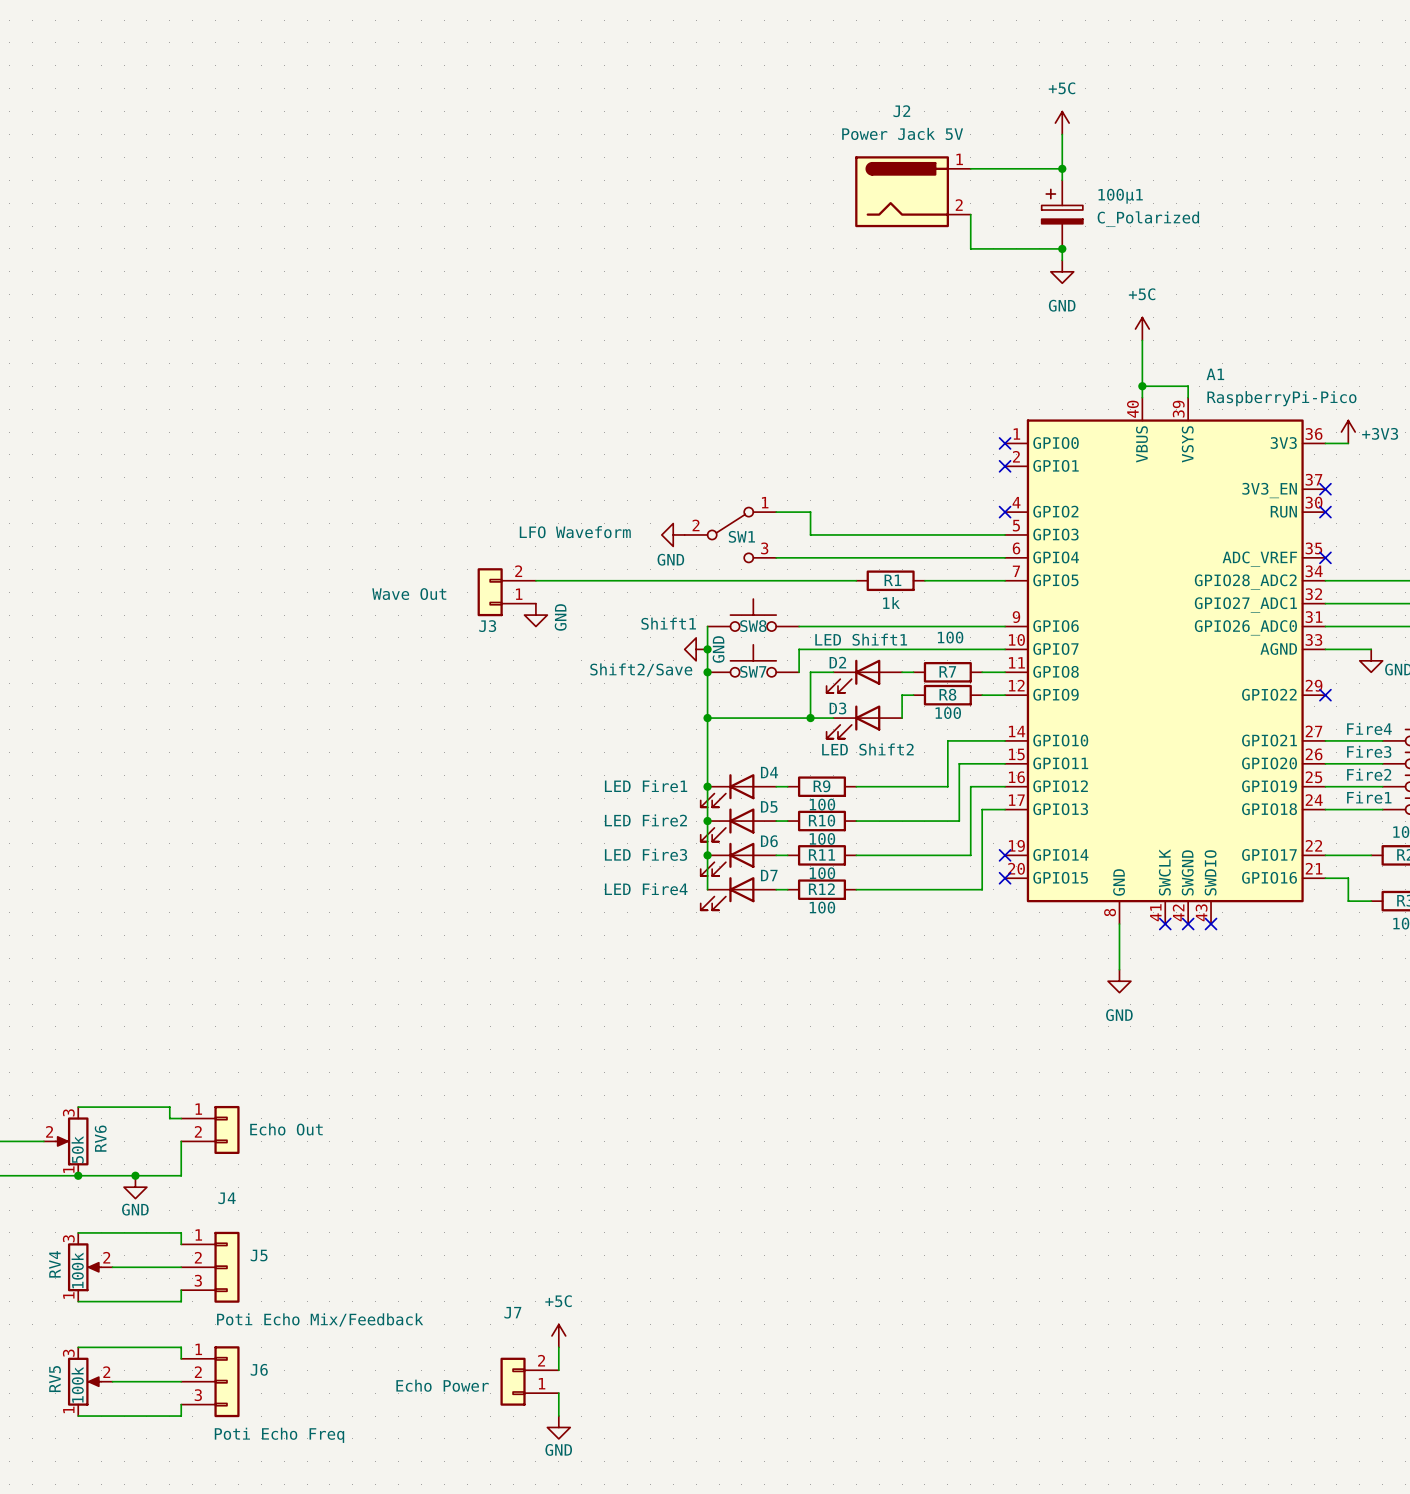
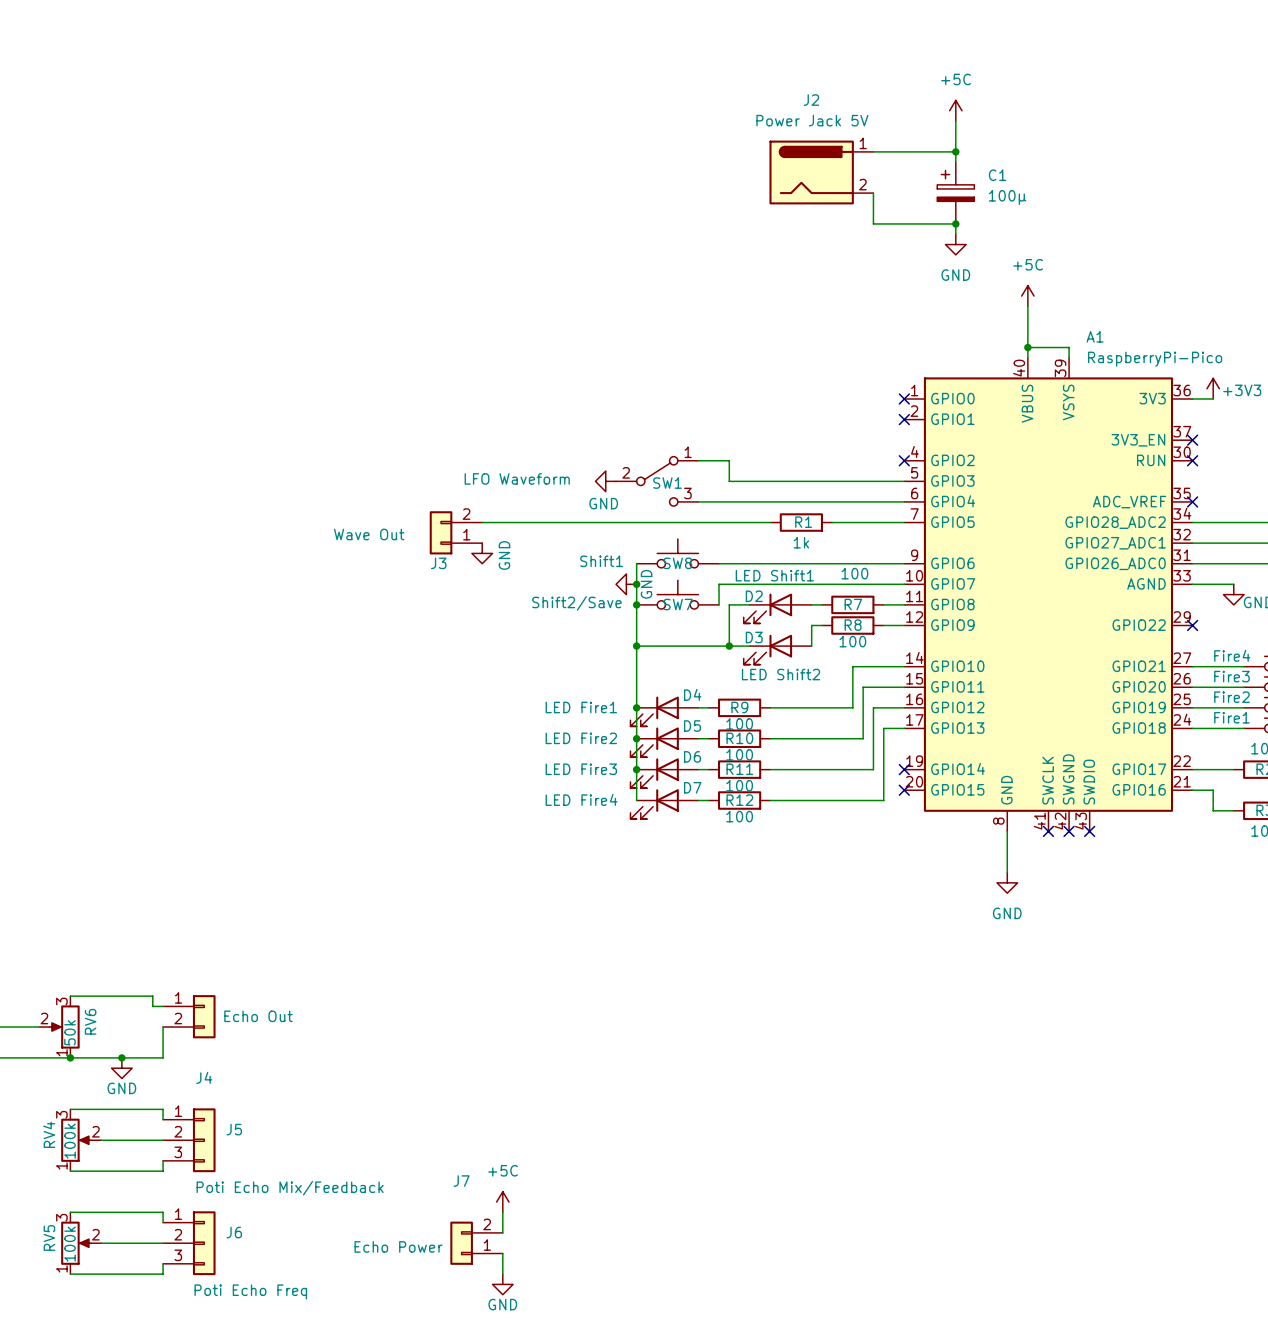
100µ1 name: 100µ1 (1120, 196) -> C1 (997, 175)
100µ1 value: C_Polarized (1148, 219) -> 100µ (1007, 197)

